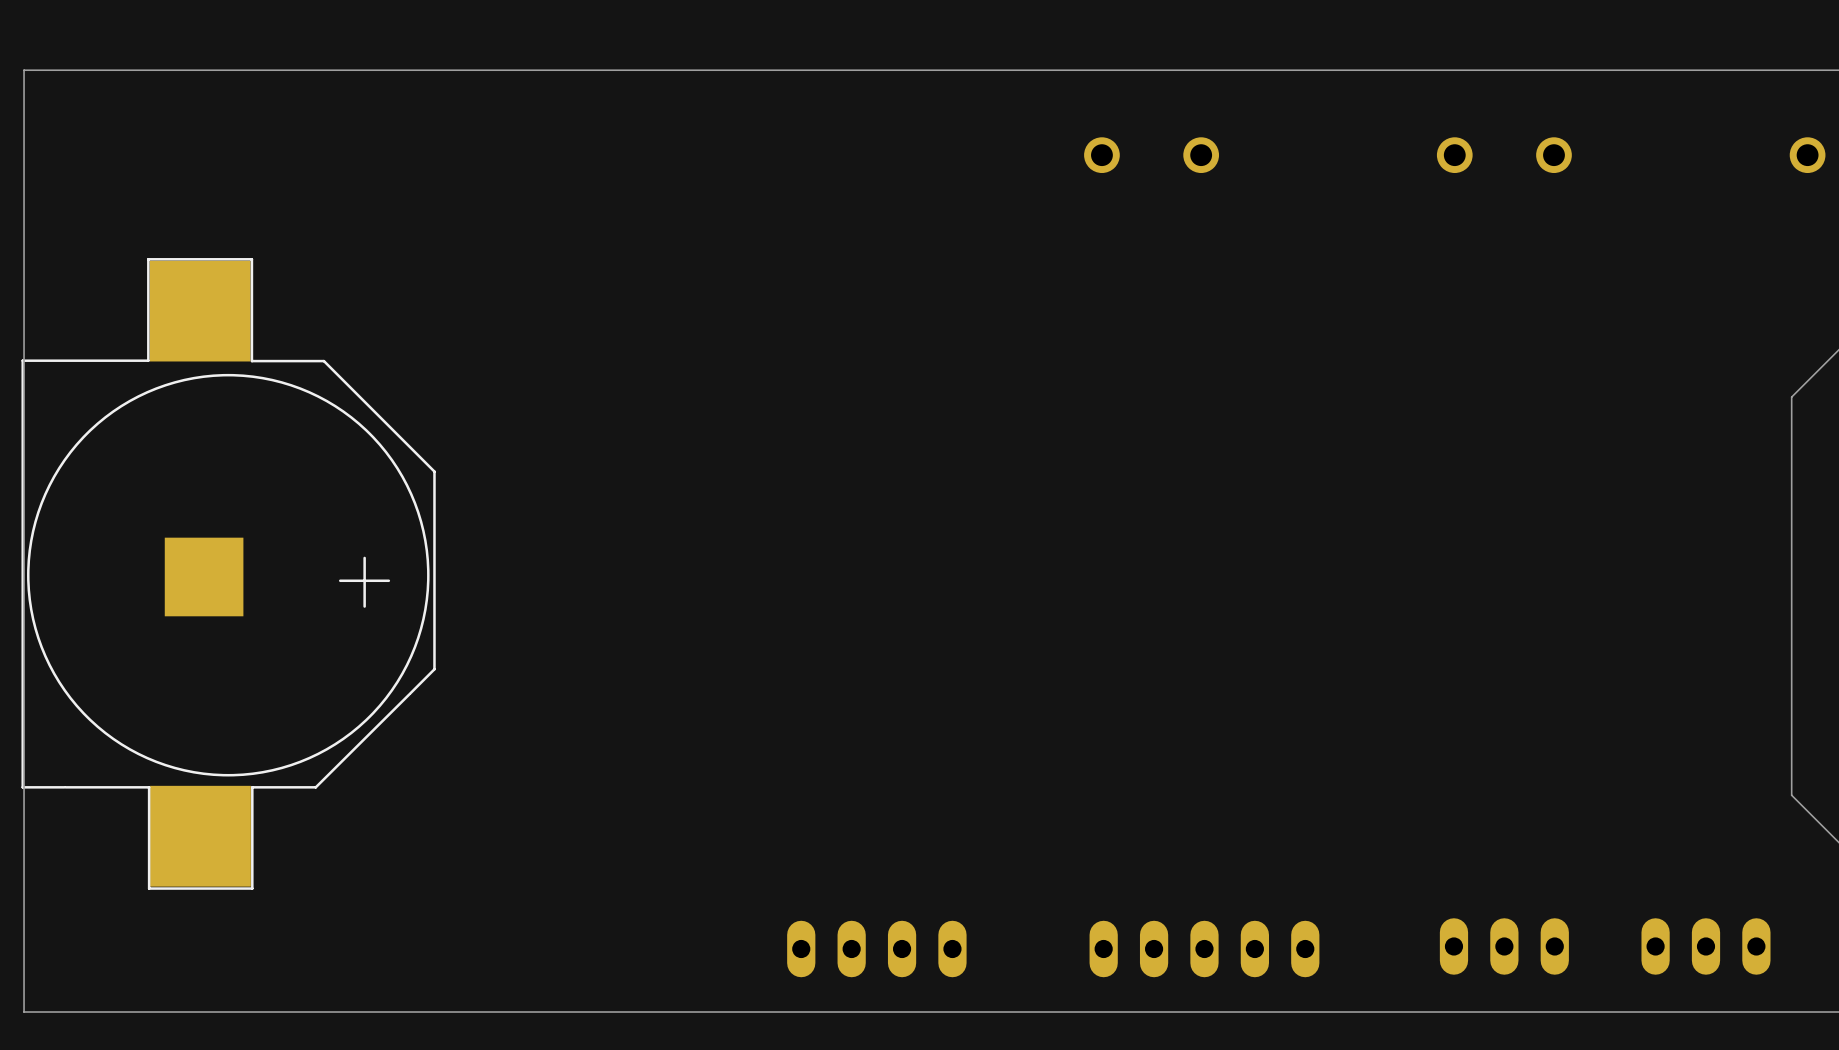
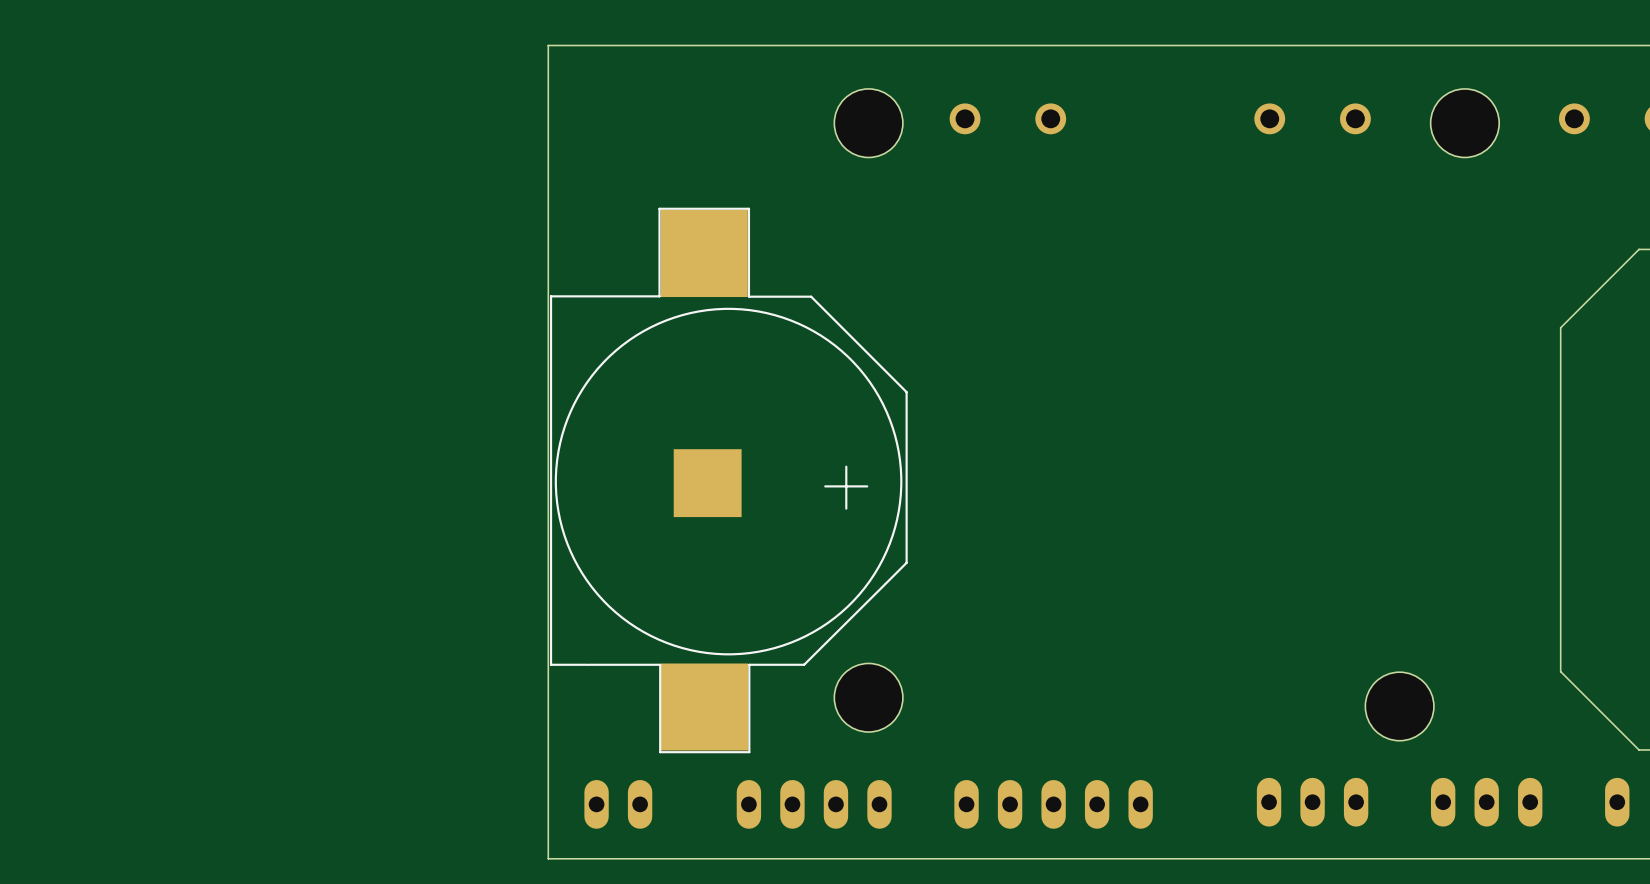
board edge: (619, 70) (24, 70) (24, 1012) (619, 1012) -> (548, 45) (548, 858)
hole: none -> (868, 123)
hole: none -> (1464, 123)
part: (228, 573) -> none
part: none -> (728, 480)
hole: none -> (868, 697)
hole: none -> (1399, 706)
part: none -> (618, 804)
part position: (876, 949) -> (814, 804)

